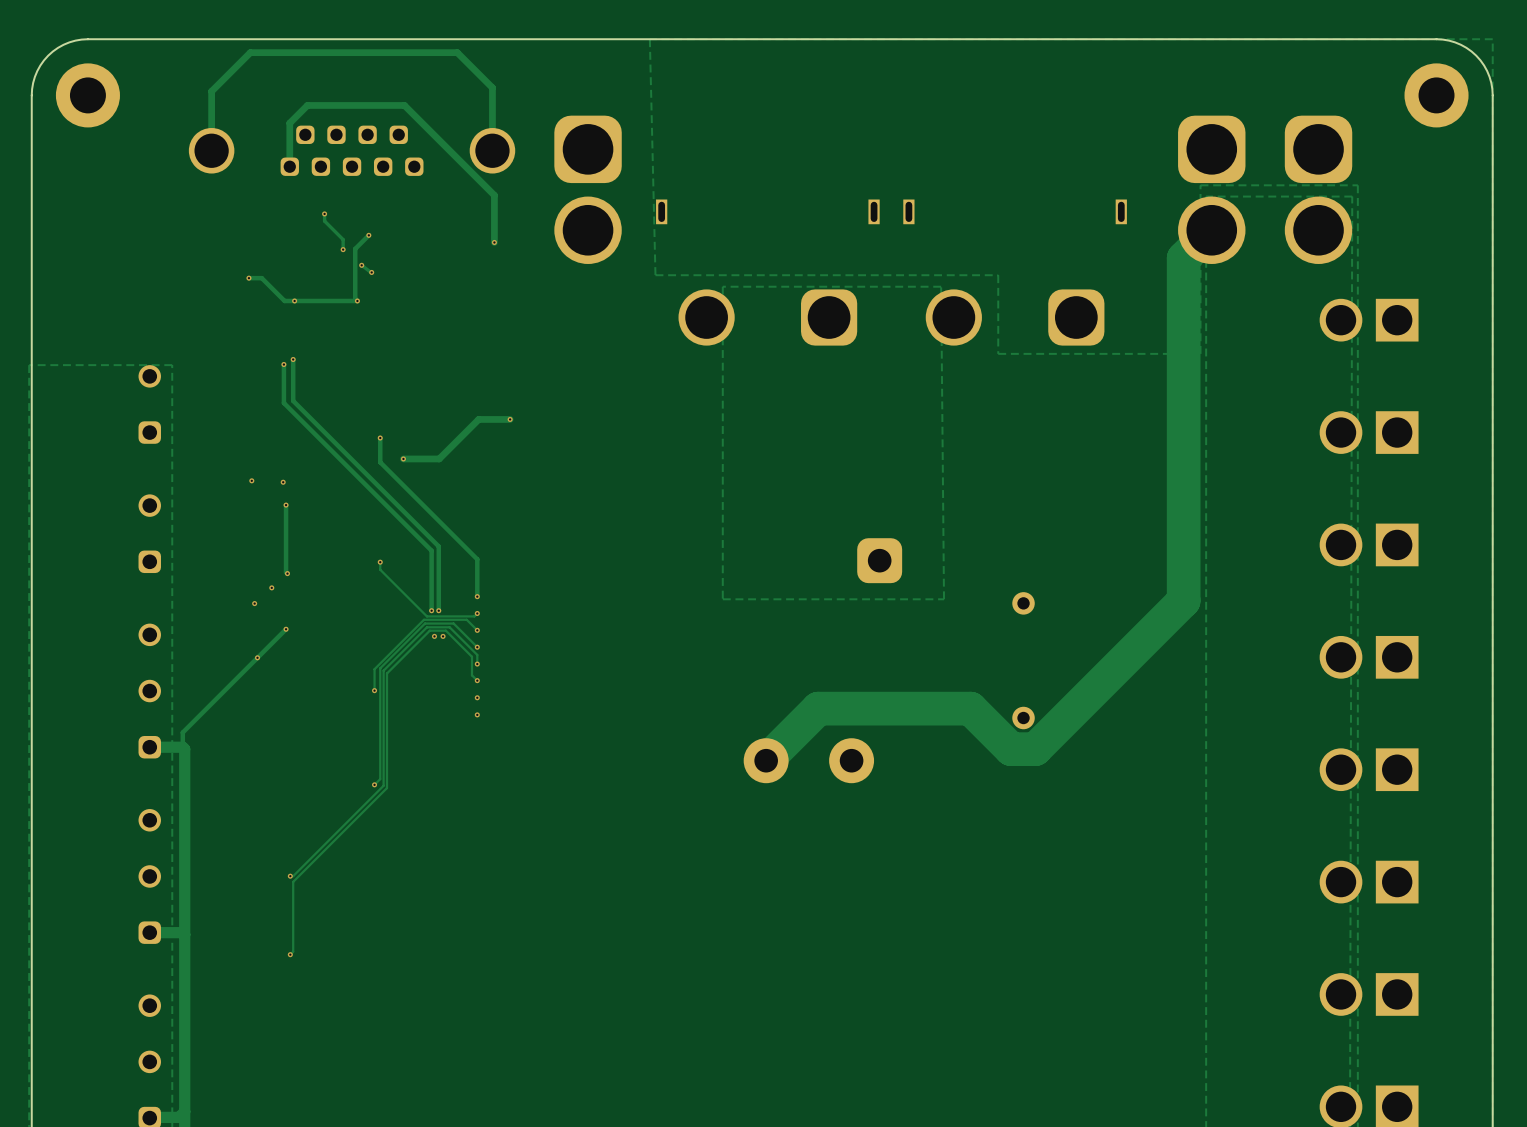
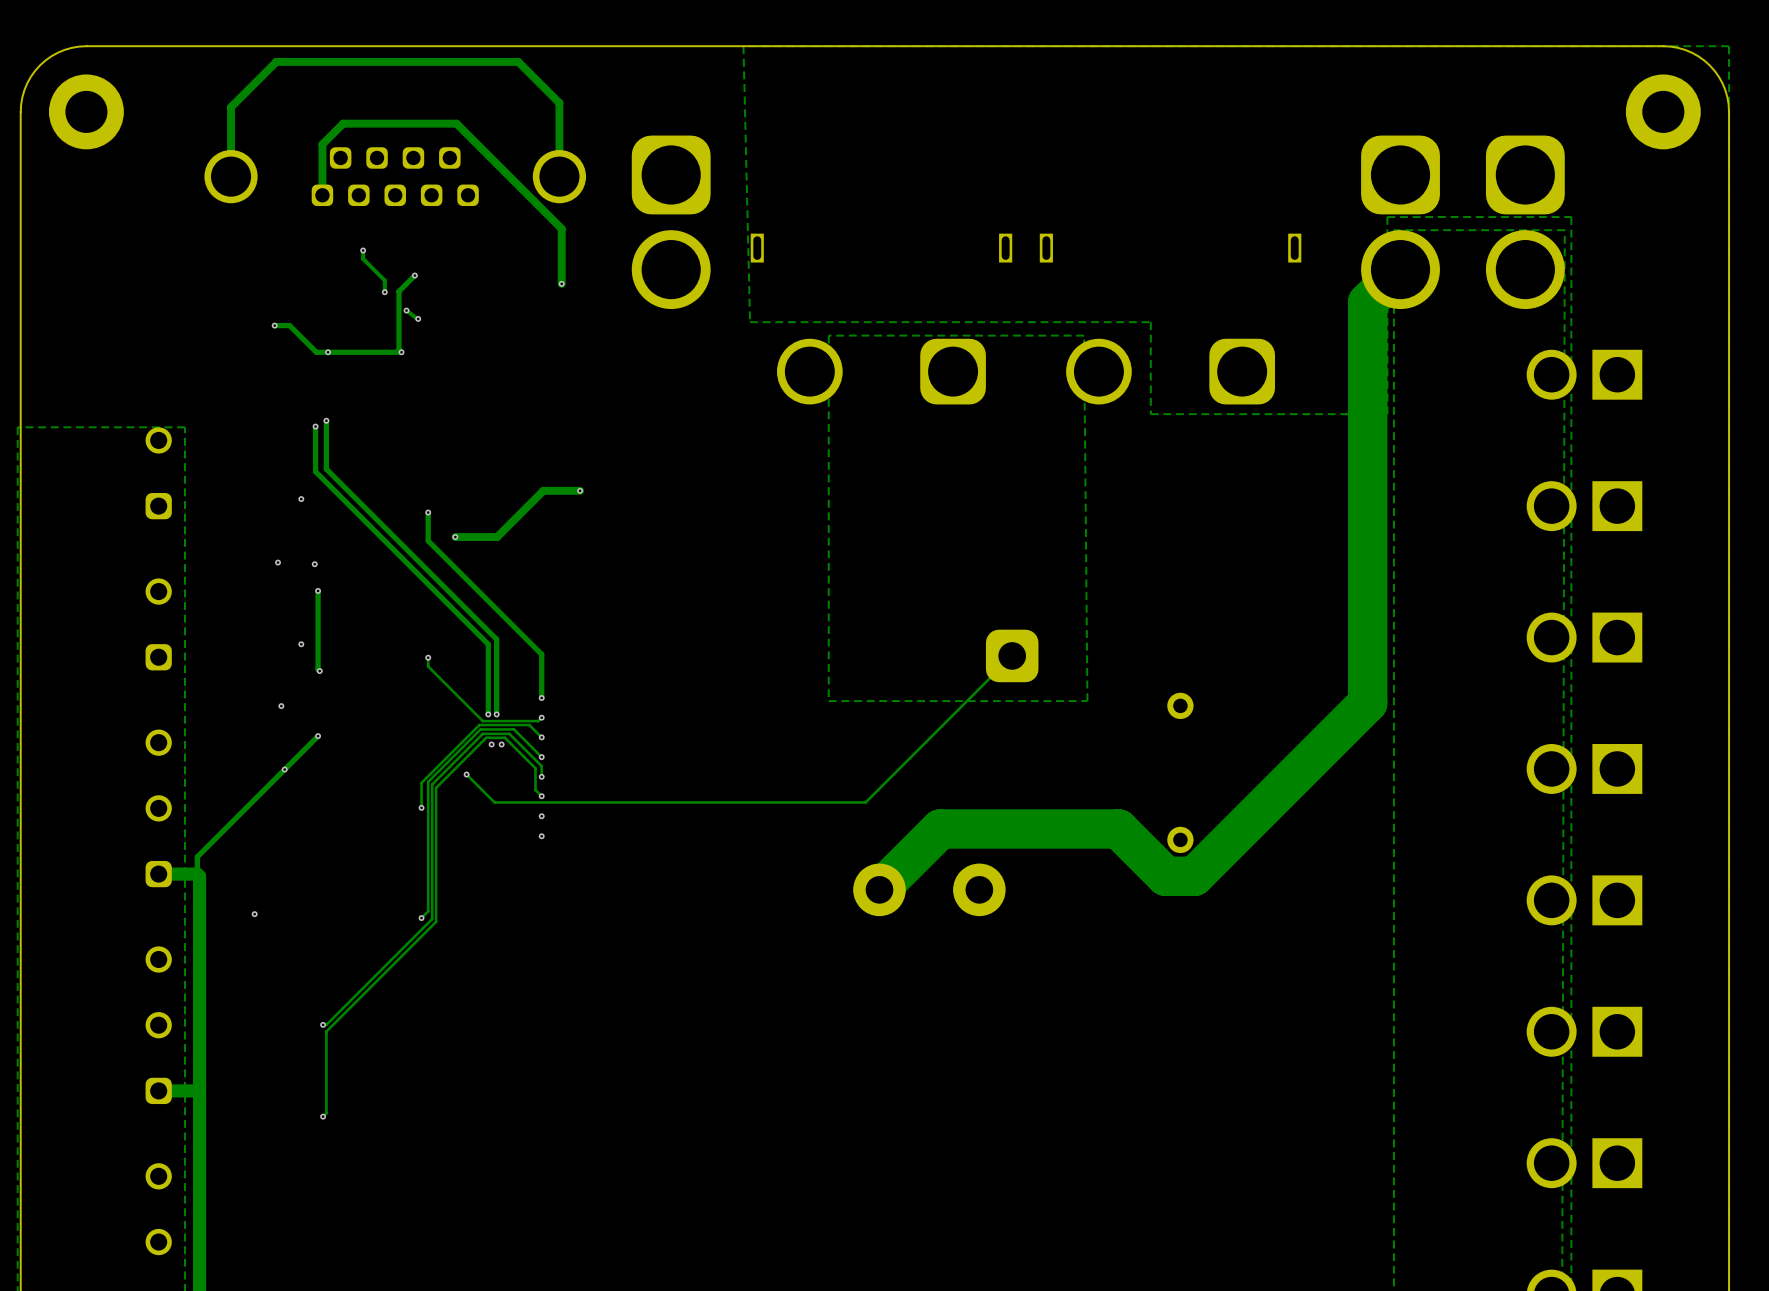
via: none -> (301, 499)
track: none -> (1012, 655) (865, 802) (494, 802) (466, 774)
via position: (271, 587) -> (301, 644)
via: none -> (466, 774)
via: none -> (254, 914)

